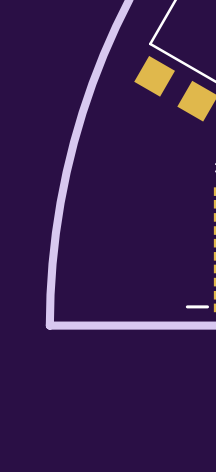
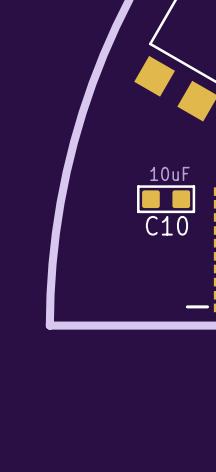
C10: none -> 10uF (166, 199)

